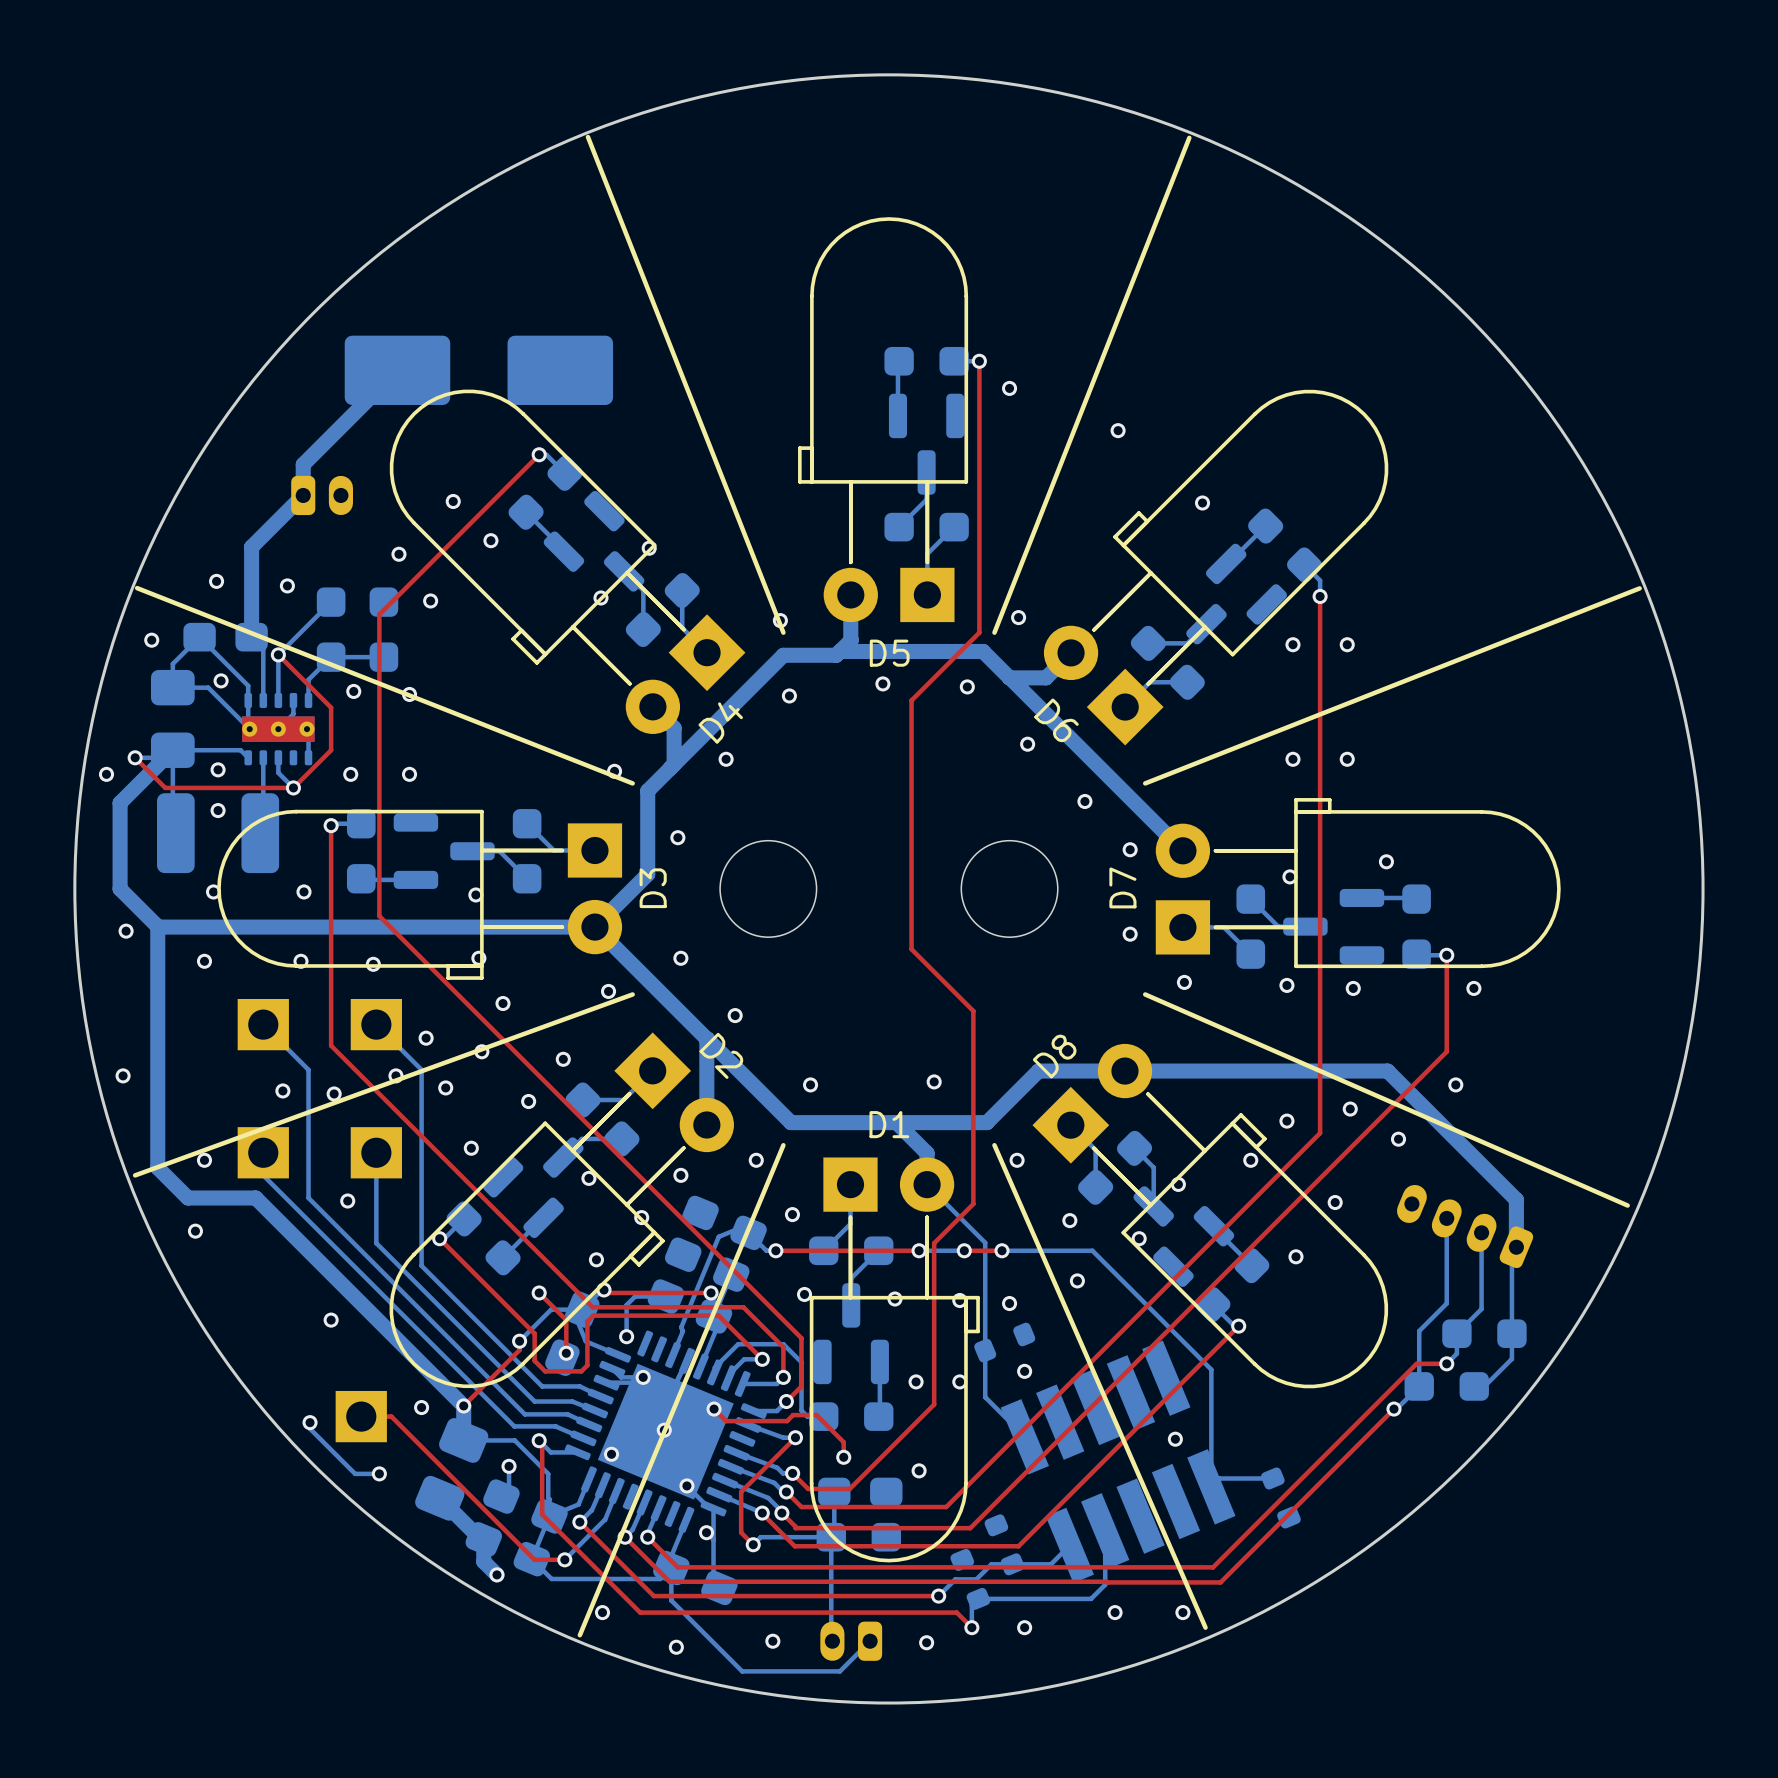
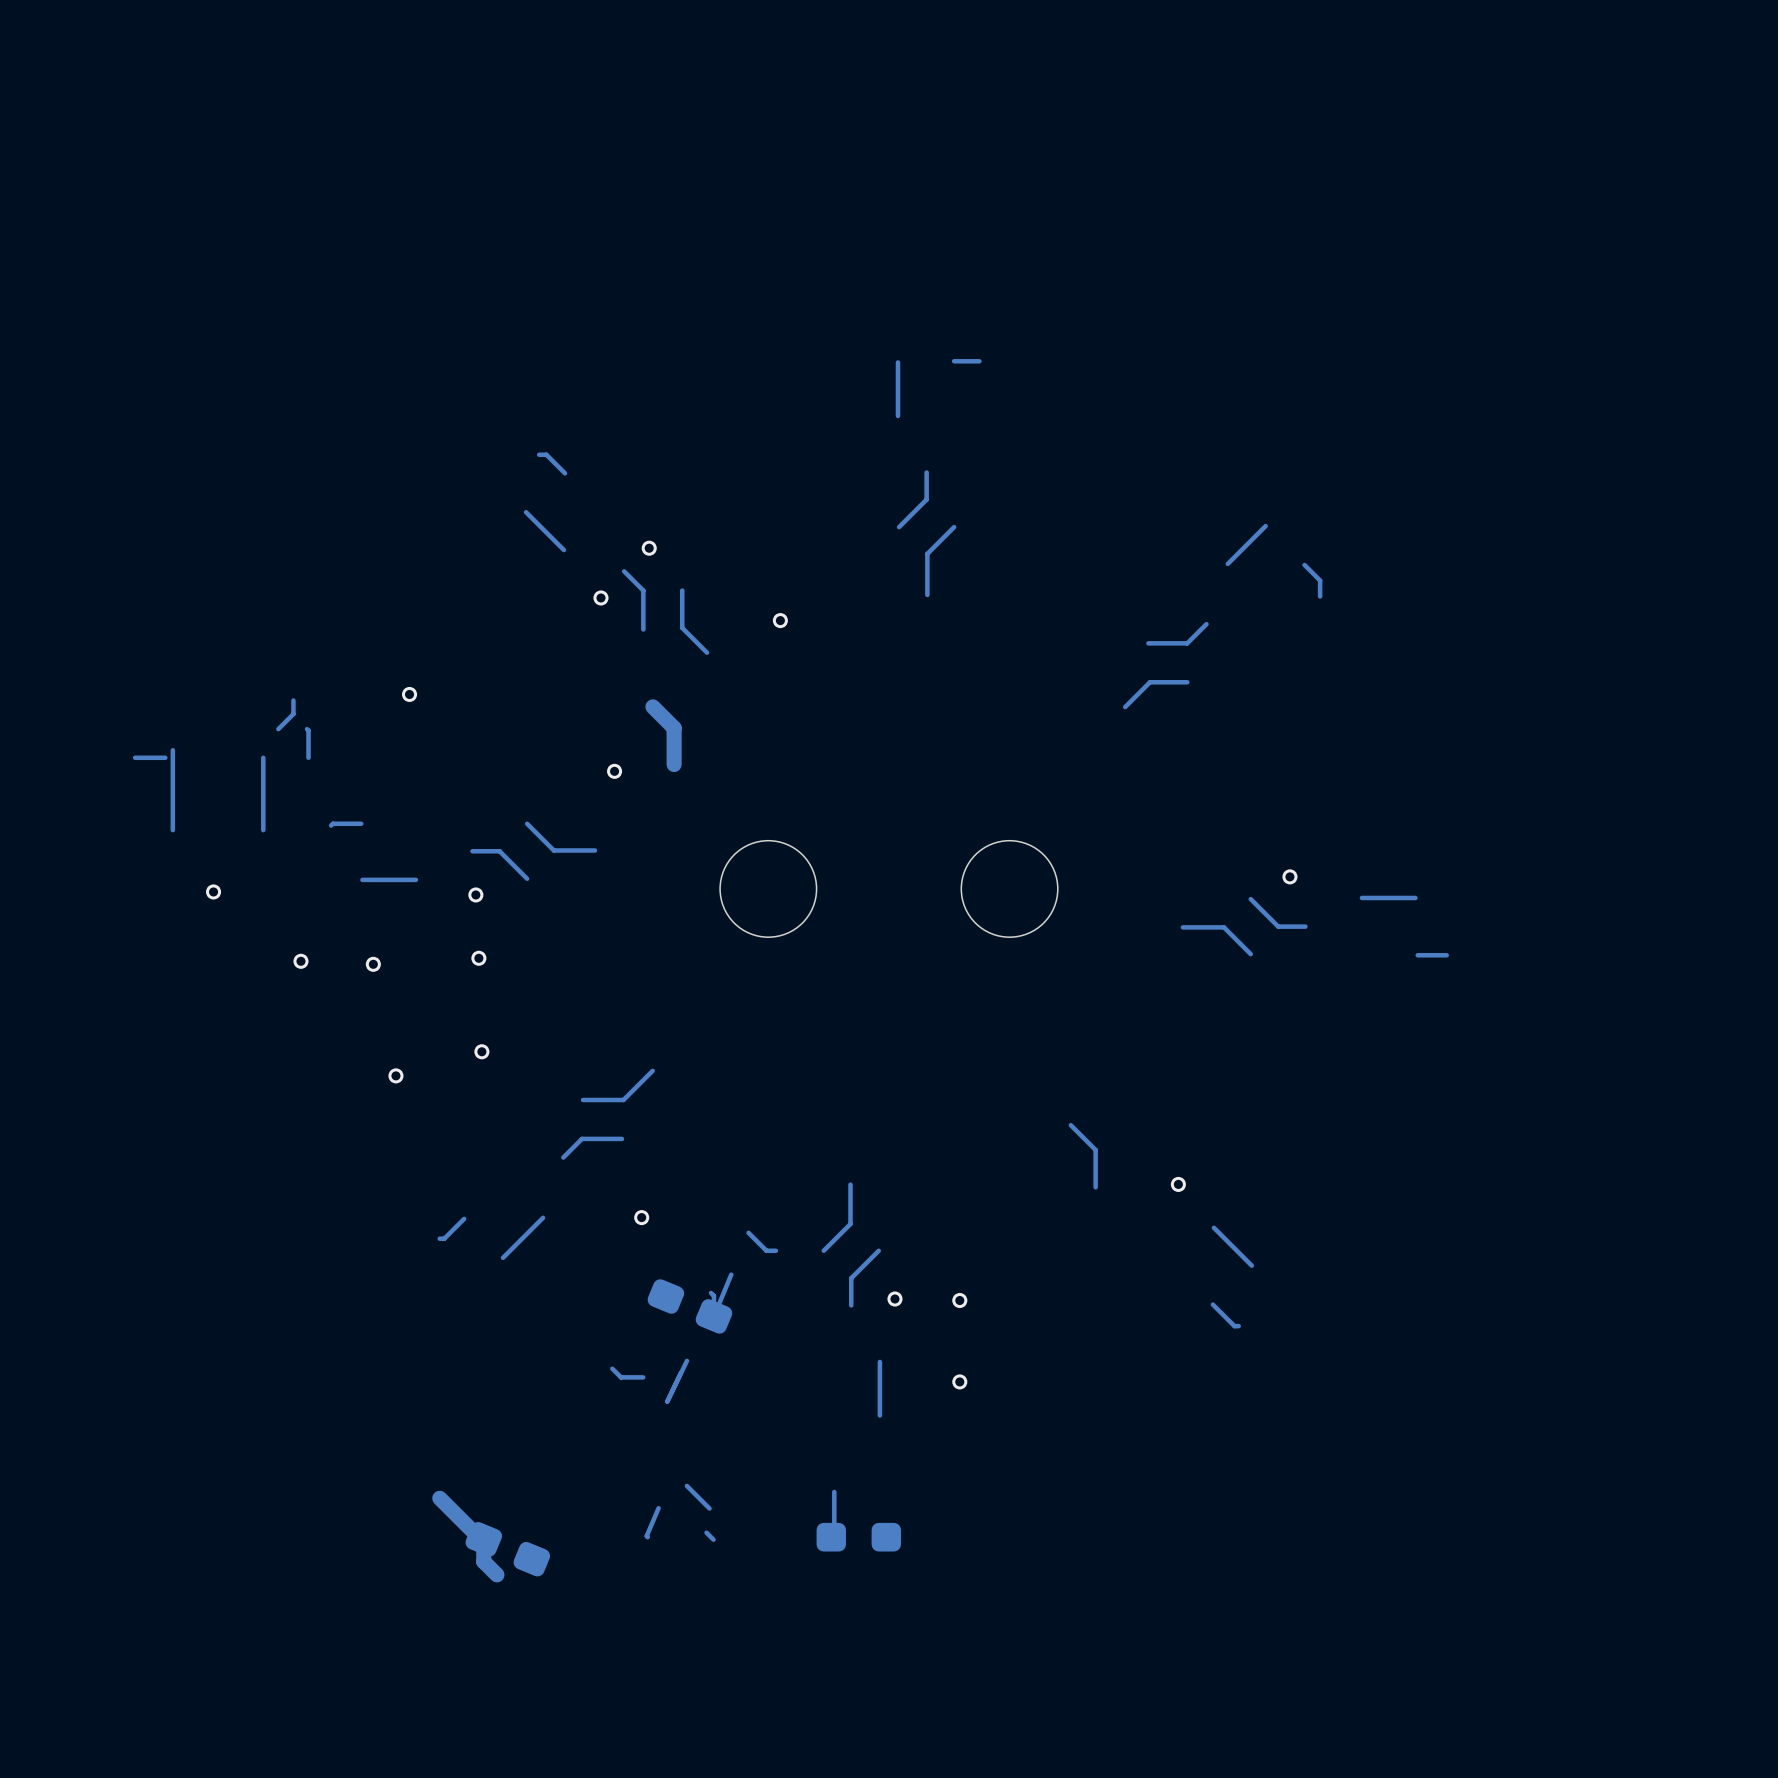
round board edge: [73, 73, 1705, 1705] -> none
line: (587, 137) (783, 632) -> none
line: (1189, 137) (994, 632) -> none
part: (926, 361) -> none
top track: (979, 361) (979, 632) (911, 700) (911, 949) (973, 1011) (973, 1204) (934, 1243) (934, 1404) (849, 1488) (808, 1488) (792, 1473) -> none
via: (979, 361) -> none
bottom track: (397, 370) (303, 464) (303, 495) (251, 547) (251, 637) (263, 648) (263, 700) -> none
part: (478, 370) -> none
via: (1009, 388) -> none
D5: (883, 419) -> none
via: (1118, 430) -> none
part: (926, 444) -> none
top track: (539, 454) (379, 614) (379, 916) (801, 1338) (801, 1386) (786, 1401) -> none
via: (539, 454) -> none
part: (545, 492) -> none
part: (322, 495) -> none
via: (453, 501) -> none
via: (1202, 503) -> none
part: (926, 527) -> none
via: (490, 540) -> none
part: (594, 541) -> none
part: (1285, 545) -> none
via: (398, 554) -> none
D4: (567, 561) -> none
D6: (1216, 567) -> none
via: (216, 581) -> none
via: (287, 585) -> none
line: (137, 588) (632, 783) -> none
line: (1639, 588) (1145, 783) -> none
bottom track: (850, 594) (851, 640) (836, 655) (783, 655) (647, 790) (647, 874) (594, 927) -> none
part: (1236, 594) -> none
top track: (1320, 596) (1320, 1133) (946, 1507) (801, 1507) (786, 1491) -> none
via: (1320, 596) -> none
via: (430, 600) -> none
bottom track: (331, 602) (278, 654) (278, 700) -> none
part: (662, 610) -> none
via: (1018, 617) -> none
part: (331, 629) -> none
part: (383, 629) -> none
part: (225, 637) -> none
via: (151, 640) -> none
via: (1292, 644) -> none
via: (1347, 644) -> none
bottom track: (839, 651) (983, 651) (1009, 677) (1046, 677) (1071, 652) -> none
top track: (278, 654) (331, 707) (331, 750) (293, 787) (165, 787) (135, 757) -> none
via: (278, 654) -> none
bottom track: (383, 657) (331, 657) (308, 679) (308, 700) -> none
part: (1167, 662) -> none
bottom track: (1010, 677) (1182, 850) -> none
via: (221, 680) -> none
via: (882, 683) -> none
via: (967, 686) -> none
via: (353, 691) -> none
via: (789, 695) -> none
part: (172, 718) -> none
bottom track: (248, 727) (248, 685) (199, 637) (172, 663) (172, 687) (208, 687) (249, 729) -> none
part: (278, 729) -> none
via: (1027, 744) -> none
via: (135, 757) -> none
bottom track: (248, 757) (240, 750) (172, 750) (120, 803) (120, 888) (158, 927) (594, 927) -> none
bottom track: (278, 757) (278, 772) (293, 787) -> none
via: (726, 759) -> none
via: (1292, 759) -> none
via: (1347, 759) -> none
via: (218, 769) -> none
via: (106, 774) -> none
via: (350, 774) -> none
via: (409, 774) -> none
via: (293, 787) -> none
via: (1084, 801) -> none
via: (218, 810) -> none
top track: (331, 825) (331, 1045) (592, 1307) (743, 1307) (783, 1347) (783, 1377) -> none
via: (331, 825) -> none
part: (218, 833) -> none
via: (677, 837) -> none
via: (1130, 849) -> none
part: (361, 851) -> none
part: (444, 851) -> none
part: (527, 851) -> none
via: (1386, 861) -> none
D7: (1358, 883) -> none
via: (304, 891) -> none
D3: (419, 894) -> none
bottom track: (157, 926) (157, 1167) (187, 1197) (255, 1197) (463, 1405) (463, 1440) (514, 1440) (548, 1473) (549, 1516) -> none
part: (1250, 926) -> none
part: (1333, 926) -> none
part: (1416, 926) -> none
bottom track: (594, 927) (706, 1038) (706, 1124) -> none
via: (126, 931) -> none
via: (1130, 934) -> none
top track: (1446, 955) (1446, 1051) (970, 1528) (795, 1528) (781, 1513) -> none
via: (1446, 955) -> none
via: (680, 958) -> none
via: (204, 961) -> none
via: (1184, 982) -> none
via: (1286, 985) -> none
via: (1353, 988) -> none
via: (1473, 988) -> none
via: (608, 991) -> none
line: (632, 994) (135, 1175) -> none
line: (1145, 994) (1627, 1205) -> none
via: (503, 1003) -> none
via: (735, 1015) -> none
bottom track: (263, 1024) (308, 1069) (308, 1197) (524, 1414) (567, 1414) (589, 1424) -> none
part: (263, 1024) -> none
bottom track: (376, 1024) (421, 1069) (421, 1265) (542, 1386) (579, 1386) (600, 1396) -> none
part: (376, 1024) -> none
via: (426, 1038) -> none
bottom track: (707, 1038) (790, 1122) (986, 1122) (1038, 1071) (1387, 1071) (1516, 1199) (1516, 1247) -> none
via: (563, 1059) -> none
via: (123, 1075) -> none
via: (934, 1081) -> none
via: (810, 1084) -> none
via: (1455, 1084) -> none
via: (445, 1087) -> none
via: (282, 1090) -> none
via: (334, 1093) -> none
via: (528, 1101) -> none
via: (1350, 1109) -> none
part: (602, 1119) -> none
via: (1286, 1121) -> none
bottom track: (896, 1122) (927, 1153) (927, 1184) (985, 1242) (985, 1397) (1024, 1436) -> none
via: (1398, 1139) -> none
line: (783, 1145) (579, 1635) -> none
line: (994, 1145) (1205, 1627) -> none
via: (471, 1148) -> none
bottom track: (1134, 1148) (1153, 1167) (1153, 1206) -> none
part: (263, 1152) -> none
bottom track: (376, 1152) (376, 1243) (534, 1401) (572, 1401) (595, 1410) -> none
part: (376, 1152) -> none
via: (204, 1160) -> none
via: (756, 1160) -> none
via: (1017, 1160) -> none
via: (1250, 1160) -> none
part: (1115, 1167) -> none
bottom track: (263, 1175) (514, 1426) (555, 1426) -> none
via: (680, 1175) -> none
via: (588, 1178) -> none
part: (533, 1187) -> none
via: (347, 1201) -> none
via: (1335, 1202) -> none
D2: (561, 1210) -> none
via: (792, 1214) -> none
D8: (1210, 1216) -> none
bottom track: (1446, 1218) (1446, 1303) (1419, 1331) (1419, 1386) (1396, 1409) (1393, 1409) -> none
via: (1069, 1220) -> none
part: (724, 1222) -> none
part: (1465, 1226) -> none
bottom track: (738, 1228) (718, 1236) (681, 1327) (682, 1331) (673, 1355) -> none
via: (195, 1231) -> none
bottom track: (1481, 1232) (1481, 1309) (1456, 1333) (1456, 1353) (1446, 1363) -> none
part: (1183, 1236) -> none
top track: (439, 1238) (534, 1333) (534, 1360) (545, 1371) (581, 1371) (587, 1365) (587, 1321) (593, 1315) (718, 1315) (762, 1359) -> none
via: (439, 1238) -> none
part: (483, 1238) -> none
via: (1139, 1238) -> none
top track: (775, 1250) (919, 1250) -> none
via: (775, 1250) -> none
part: (851, 1250) -> none
bottom track: (919, 1250) (964, 1250) -> none
via: (919, 1250) -> none
top track: (964, 1250) (1002, 1250) -> none
via: (964, 1250) -> none
bottom track: (1002, 1250) (1092, 1250) (1211, 1369) (1211, 1486) (1219, 1478) (1272, 1478) -> none
via: (1002, 1250) -> none
bottom track: (1511, 1251) (1511, 1358) (1484, 1386) -> none
via: (1295, 1256) -> none
via: (596, 1259) -> none
part: (707, 1264) -> none
via: (1077, 1280) -> none
part: (1232, 1285) -> none
bottom track: (604, 1289) (582, 1309) (551, 1309) (519, 1341) -> none
top track: (604, 1289) (607, 1292) (711, 1292) -> none
via: (604, 1289) -> none
top track: (539, 1292) (566, 1320) (566, 1353) -> none
via: (539, 1292) -> none
via: (711, 1292) -> none
via: (804, 1294) -> none
bottom track: (665, 1296) (635, 1296) (626, 1305) (626, 1336) -> none
via: (1009, 1303) -> none
via: (331, 1320) -> none
bottom track: (577, 1321) (585, 1341) (618, 1354) -> none
bottom track: (717, 1325) (700, 1366) -> none
top track: (1238, 1326) (1018, 1546) (794, 1546) (762, 1513) -> none
via: (1238, 1326) -> none
part: (572, 1333) -> none
part: (851, 1333) -> none
part: (1484, 1333) -> none
via: (626, 1336) -> none
top track: (519, 1341) (519, 1350) (463, 1405) -> none
via: (519, 1341) -> none
part: (1004, 1342) -> none
via: (566, 1353) -> none
bottom track: (762, 1359) (744, 1359) (728, 1374) -> none
via: (762, 1359) -> none
D1: (894, 1359) -> none
top track: (1446, 1363) (1416, 1363) (1213, 1567) (677, 1567) (647, 1537) -> none
via: (1446, 1363) -> none
via: (1024, 1371) -> none
bottom track: (714, 1372) (714, 1367) (738, 1344) (783, 1344) (801, 1362) (801, 1410) (807, 1416) (823, 1416) -> none
via: (643, 1377) -> none
bottom track: (783, 1377) (776, 1383) (742, 1383) -> none
via: (783, 1377) -> none
via: (916, 1381) -> none
bottom track: (606, 1382) (637, 1382) -> none
part: (1446, 1386) -> none
bottom track: (786, 1401) (776, 1411) (753, 1411) -> none
via: (786, 1401) -> none
via: (463, 1405) -> none
via: (421, 1407) -> none
top track: (714, 1409) (726, 1421) (787, 1421) (793, 1415) (816, 1415) (843, 1442) (843, 1457) -> none
via: (714, 1409) -> none
top track: (1393, 1409) (1220, 1582) (669, 1581) (625, 1537) -> none
via: (1393, 1409) -> none
top track: (361, 1416) (391, 1416) (534, 1559) (564, 1559) -> none
part: (361, 1416) -> none
part: (851, 1416) -> none
bottom track: (310, 1422) (310, 1428) (355, 1473) (379, 1473) -> none
via: (310, 1422) -> none
bottom track: (748, 1424) (783, 1437) (795, 1437) -> none
bottom track: (556, 1426) (583, 1438) -> none
via: (664, 1430) -> none
part: (665, 1431) -> none
top track: (795, 1437) (741, 1491) (741, 1532) (753, 1544) -> none
via: (795, 1437) -> none
via: (1175, 1439) -> none
bottom track: (539, 1440) (550, 1452) (577, 1452) -> none
top track: (539, 1440) (542, 1443) (542, 1514) (640, 1612) (956, 1612) (971, 1627) -> none
via: (539, 1440) -> none
bottom track: (736, 1452) (777, 1467) (782, 1473) (792, 1473) -> none
via: (611, 1454) -> none
via: (843, 1457) -> none
part: (1118, 1461) -> none
bottom track: (509, 1466) (509, 1489) -> none
via: (509, 1466) -> none
bottom track: (730, 1466) (774, 1482) (783, 1491) (786, 1491) -> none
part: (451, 1469) -> none
via: (919, 1470) -> none
via: (379, 1473) -> none
via: (792, 1473) -> none
bottom track: (588, 1479) (578, 1504) (549, 1516) -> none
bottom track: (725, 1480) (768, 1498) (781, 1513) -> none
bottom track: (602, 1485) (591, 1510) (579, 1522) -> none
via: (686, 1485) -> none
bottom track: (616, 1490) (605, 1519) -> none
via: (786, 1491) -> none
part: (860, 1491) -> none
bottom track: (719, 1494) (762, 1513) -> none
part: (1280, 1498) -> none
bottom track: (644, 1502) (632, 1529) (625, 1537) -> none
part: (525, 1506) -> none
bottom track: (713, 1508) (713, 1574) -> none
via: (762, 1513) -> none
via: (781, 1513) -> none
bottom track: (549, 1516) (531, 1559) (551, 1578) (660, 1578) (671, 1568) (671, 1600) (742, 1671) (839, 1671) (870, 1641) -> none
bottom track: (604, 1519) (564, 1559) -> none
bottom track: (686, 1519) (668, 1562) -> none
top track: (579, 1522) (653, 1596) (938, 1596) -> none
via: (579, 1522) -> none
bottom track: (1105, 1530) (1105, 1584) (1091, 1598) (978, 1598) (971, 1605) (971, 1627) -> none
via: (706, 1532) -> none
via: (625, 1537) -> none
via: (647, 1537) -> none
bottom track: (753, 1544) (760, 1537) (831, 1537) (831, 1640) -> none
via: (753, 1544) -> none
part: (1004, 1544) -> none
bottom track: (1069, 1545) (1050, 1564) (991, 1564) (976, 1579) (955, 1579) (938, 1596) -> none
via: (564, 1559) -> none
via: (496, 1574) -> none
part: (695, 1577) -> none
part: (970, 1579) -> none
via: (938, 1596) -> none
via: (602, 1612) -> none
via: (1115, 1612) -> none
via: (1182, 1612) -> none
via: (971, 1627) -> none
via: (1024, 1627) -> none
via: (772, 1641) -> none
part: (851, 1641) -> none
via: (926, 1642) -> none
via: (676, 1647) -> none

